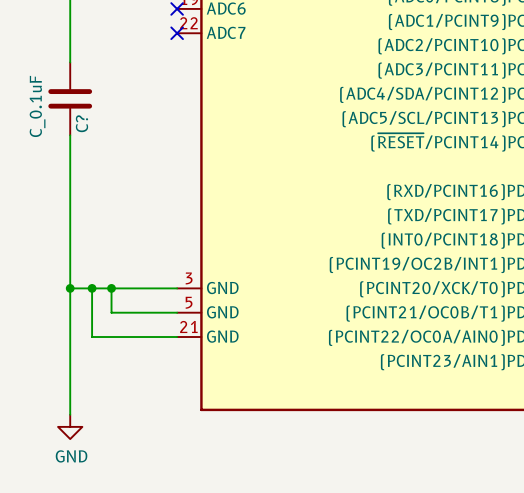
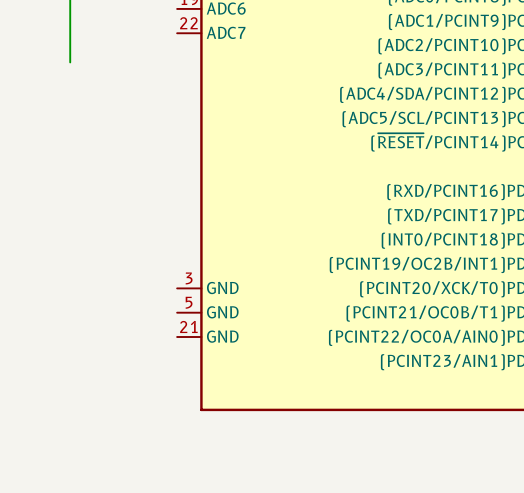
no-connect mark: (177, 8) -> none
no-connect mark: (177, 33) -> none
C?: C_0.1uF (70, 98) -> none
wire: (70, 135) (70, 414) -> none
wire: (70, 288) (177, 288) -> none
junction: (70, 288) -> none
wire: (92, 288) (92, 337) (177, 337) -> none
junction: (92, 288) -> none
wire: (111, 288) (111, 312) (177, 312) -> none
junction: (111, 288) -> none
power symbol: GND (70, 426) -> none

